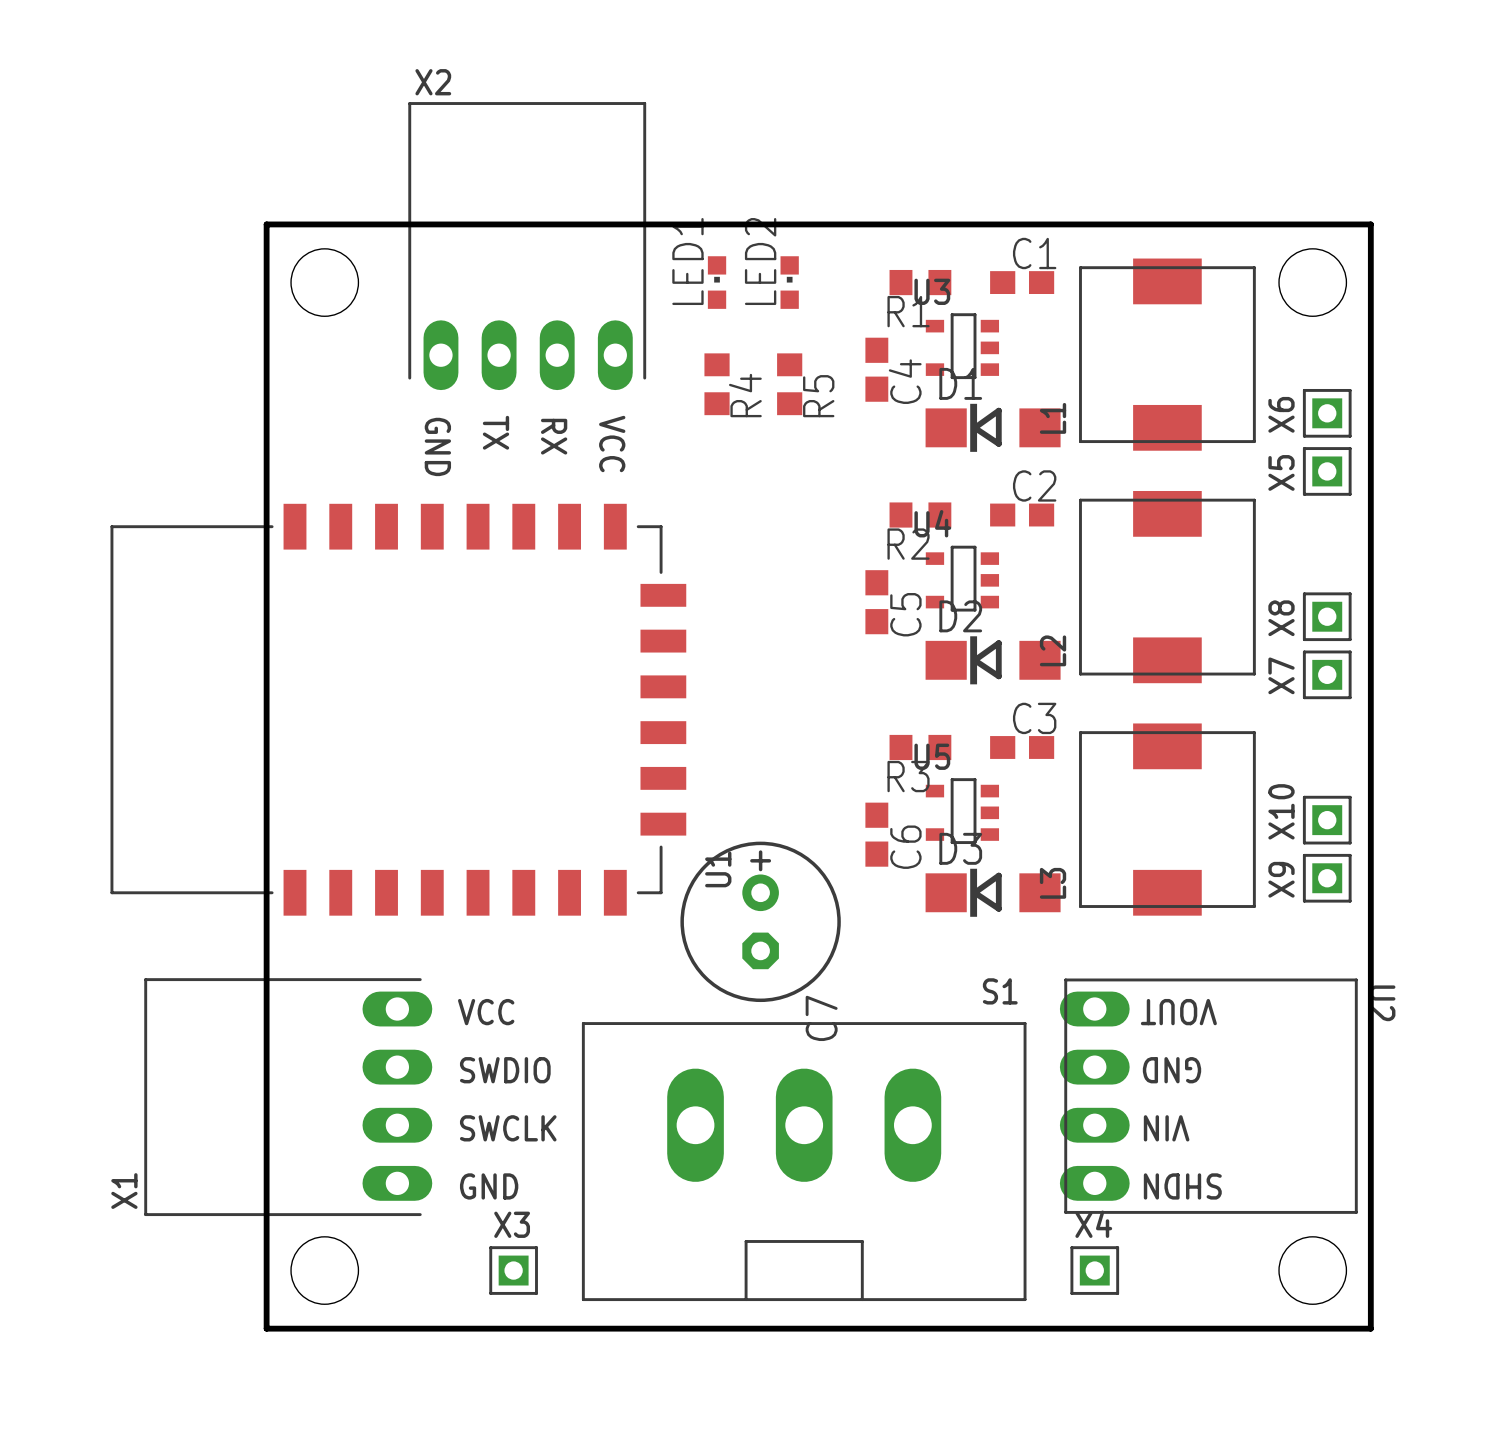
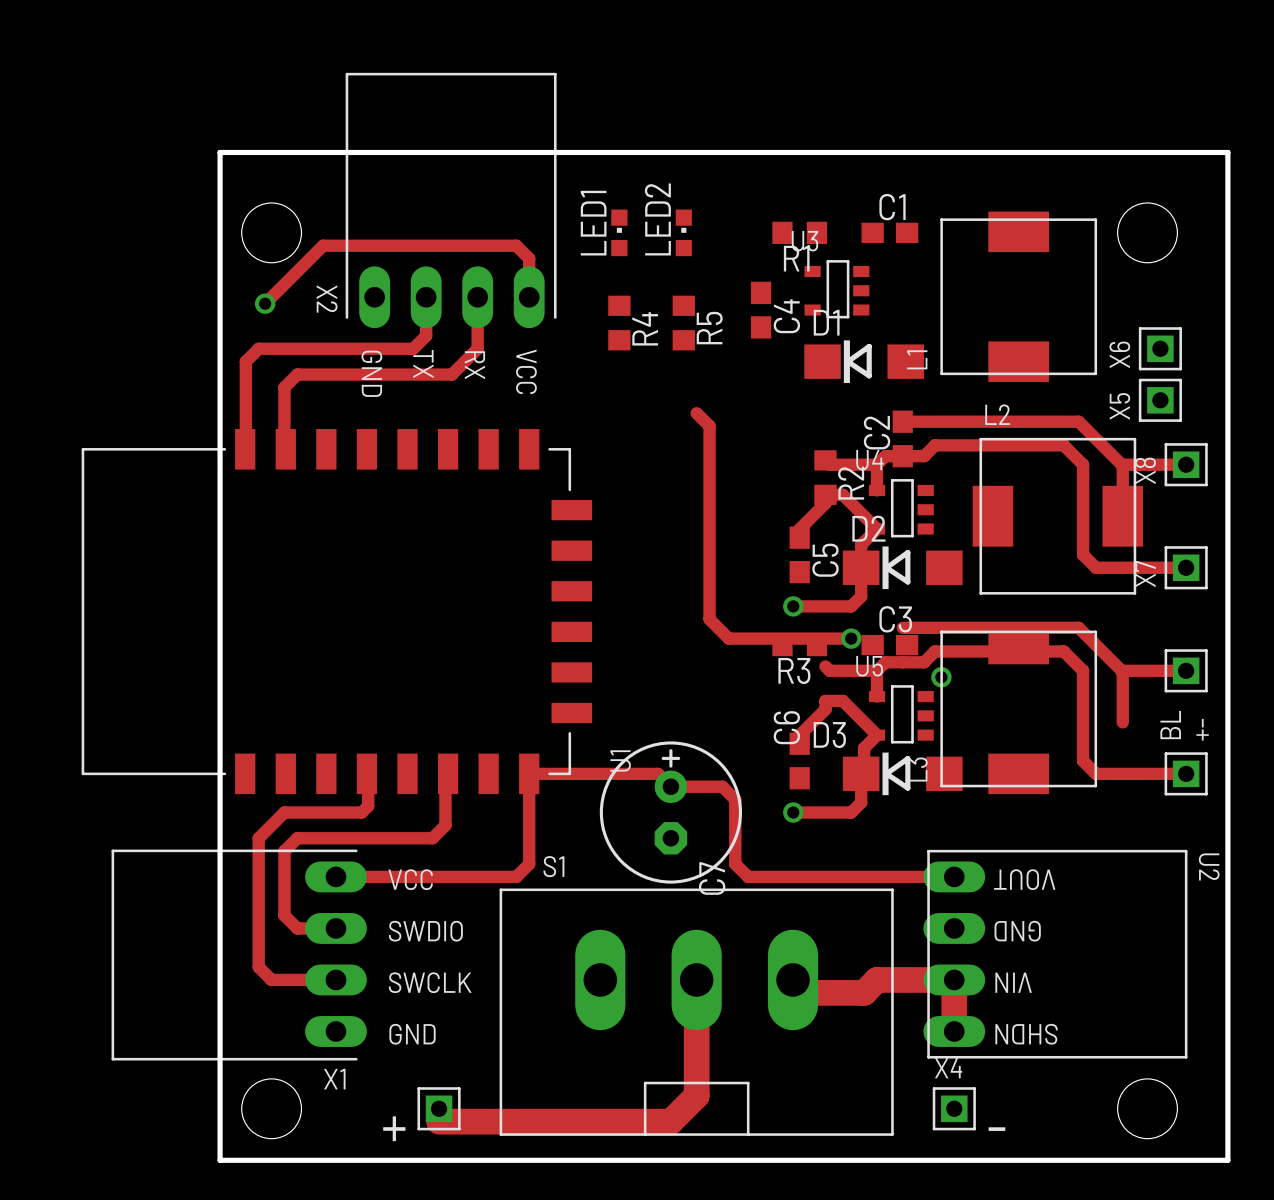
X2 name rotation: 0° (433, 82) -> 90° clockwise (327, 299)
X2 name position: X2 (433, 82) -> X2 (327, 299)
board edge: (266, 224) (1370, 224) (1370, 1328) -> (220, 181) (220, 152) (1227, 152) (1227, 1160) (1199, 1160)
track: none -> (426, 297) (426, 335) (413, 348) (258, 348) (245, 361) (245, 449)
track: none -> (477, 297) (477, 348) (451, 374) (297, 374) (284, 387) (285, 449)
track: none -> (529, 297) (529, 258) (516, 245) (323, 245) (265, 303)
via: none -> (265, 303)
track: none -> (696, 413) (709, 426) (709, 619) (728, 638) (851, 638)
C2 name position: C2 (1034, 485) -> C2 (877, 432)
track: none -> (902, 421) (1078, 421) (1122, 465) (1122, 516)
R2 rotation: 0° (920, 515) -> 90° clockwise (825, 477)
R2 position: (920, 515) -> (825, 477)
C2 rotation: 0° (1022, 515) -> 90° clockwise (902, 438)
track: none -> (825, 460) (829, 464) (877, 464)
R2 name position: R2 (908, 544) -> R2 (851, 483)
track: none -> (877, 464) (877, 490)
track: none -> (877, 464) (885, 456) (924, 456) (934, 445) (1063, 445) (1083, 464) (1083, 554) (1095, 567) (1186, 567)
track: none -> (1121, 464) (1186, 464)
U4 position: (962, 578) -> (901, 508)
L2 rotation: 0° (1167, 587) -> 90° clockwise (1057, 516)
C5 position: (876, 602) -> (799, 554)
X8 position: (1327, 616) -> (1186, 464)
track: none -> (799, 537) (799, 529) (825, 503) (825, 494) (842, 494) (877, 529) (861, 544) (861, 596) (851, 606) (793, 606)
D2 position: (993, 660) -> (902, 567)
X7 position: (1327, 674) -> (1186, 567)
via: none -> (793, 606)
track: none -> (902, 627) (1078, 627) (1122, 671) (1122, 722)
via: none -> (851, 638)
track: none -> (825, 666) (829, 670) (877, 670)
track: none -> (877, 670) (877, 696)
track: none -> (877, 670) (885, 662) (924, 662) (934, 651) (1063, 651) (1083, 670) (1083, 760) (1095, 773) (1186, 773)
track: none -> (1121, 670) (1186, 670)
part: none -> (1186, 670)
via: none -> (941, 677)
U5 position: (962, 811) -> (901, 714)
X10: (1327, 820) -> none
text: none -> +- (1202, 729)
text: none -> BL (1170, 725)
C6 position: (876, 834) -> (799, 760)
track: none -> (877, 735) (842, 700) (825, 700) (825, 709) (799, 735) (799, 743)
track: none -> (877, 735) (864, 748) (864, 770) (861, 773) (861, 802) (851, 812) (793, 812)
X9: (1327, 878) -> none
track: none -> (366, 773) (368, 806) (361, 812) (284, 812) (258, 838) (258, 967) (271, 979) (336, 979)
track: none -> (448, 773) (445, 776) (445, 825) (432, 838) (297, 838) (284, 851) (284, 915) (297, 928) (336, 928)
D3 position: (993, 892) -> (902, 773)
part: none -> (1186, 773)
C7 position: (760, 921) -> (670, 812)
via: none -> (793, 812)
S1 name position: S1 (1000, 991) -> S1 (553, 866)
track: none -> (336, 876) (516, 876) (529, 864) (529, 773) (658, 773) (670, 786) (722, 786) (735, 799) (735, 864) (748, 876) (954, 876)
track: none -> (696, 992) (696, 1095) (670, 1121) (439, 1121)
track: none -> (793, 992) (864, 992) (877, 979) (954, 979) (954, 1031)
X1 name rotation: 0° (124, 1191) -> 90° clockwise (334, 1079)
X1 name position: X1 (124, 1191) -> X1 (334, 1079)
X3 name: X3 (512, 1224) -> none
text: none -> + (394, 1128)
text: none -> - (996, 1129)

